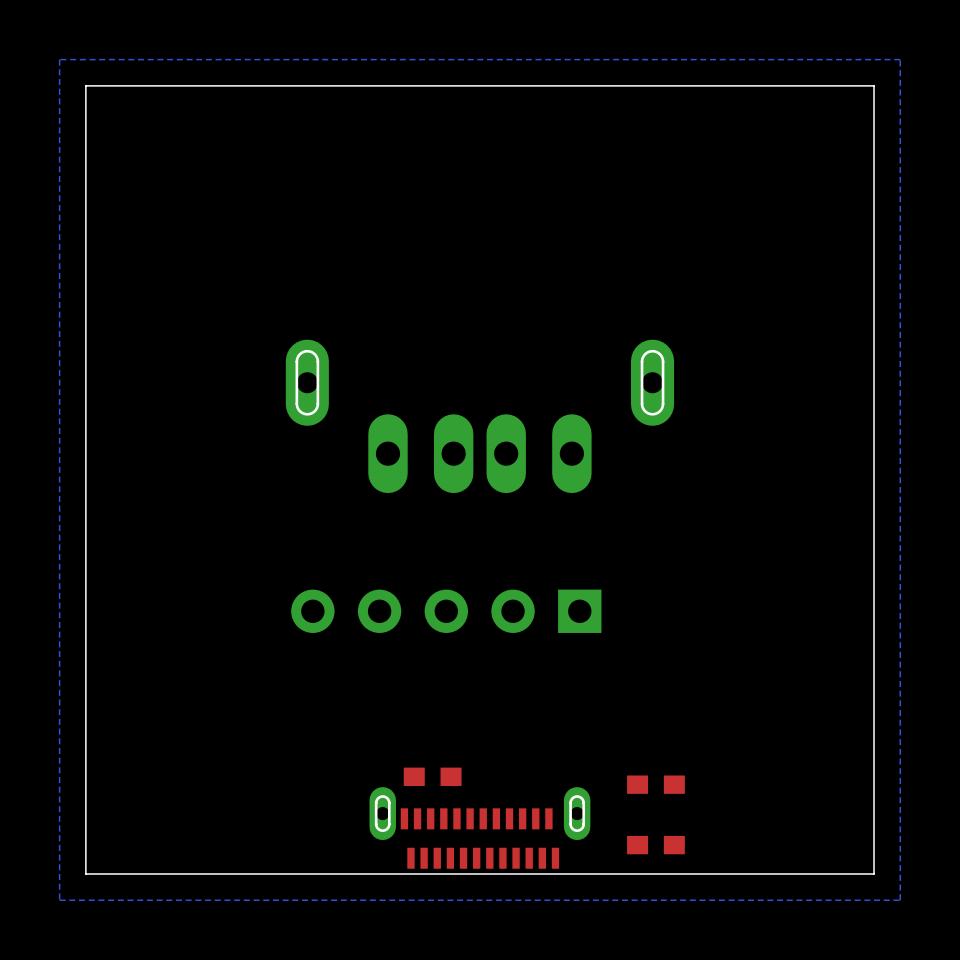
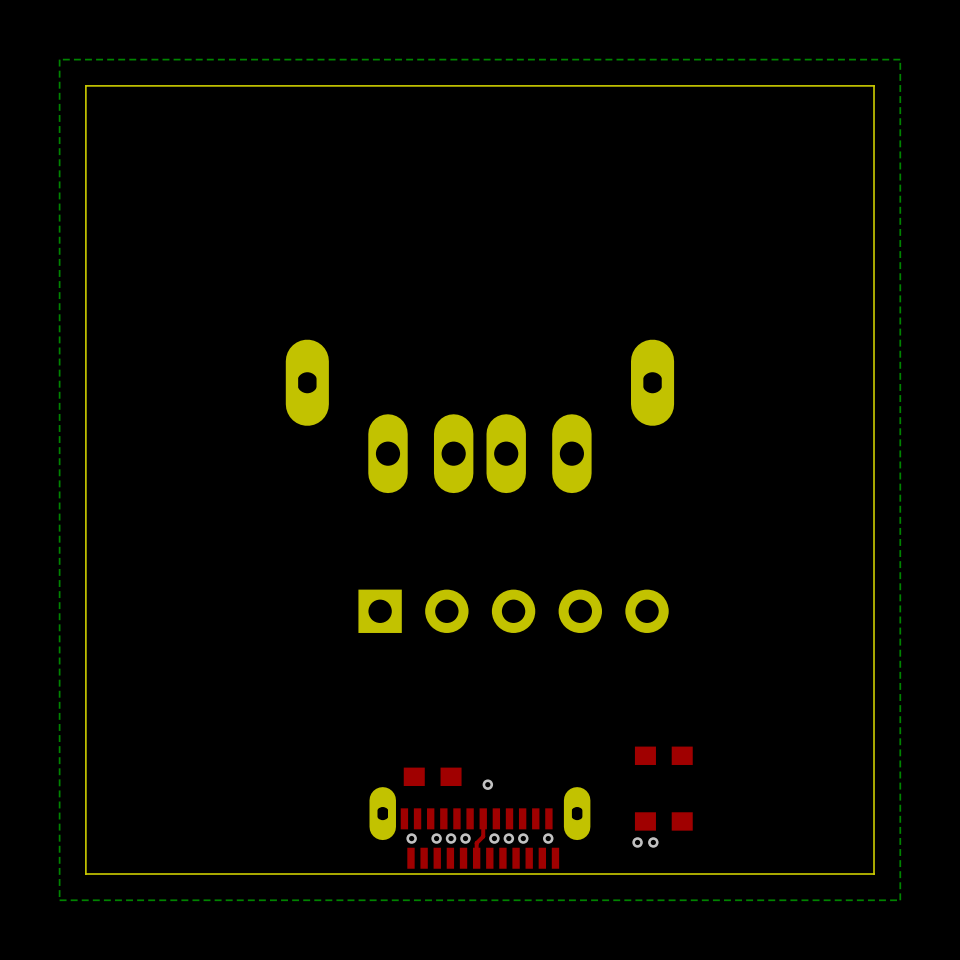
part rotation: 0° (446, 611) -> 180° (513, 611)
part: none -> (663, 755)
via: none -> (487, 784)
part: (655, 784) -> none
top track: none -> (483, 818) (483, 836) (476, 843) (476, 858)
part: none -> (663, 821)
via: none -> (411, 838)
via: none -> (436, 838)
via: none -> (451, 838)
via: none -> (465, 838)
via: none -> (494, 838)
via: none -> (508, 838)
via: none -> (523, 838)
via: none -> (548, 838)
via: none -> (637, 842)
via: none -> (653, 842)
part: (655, 845) -> none

